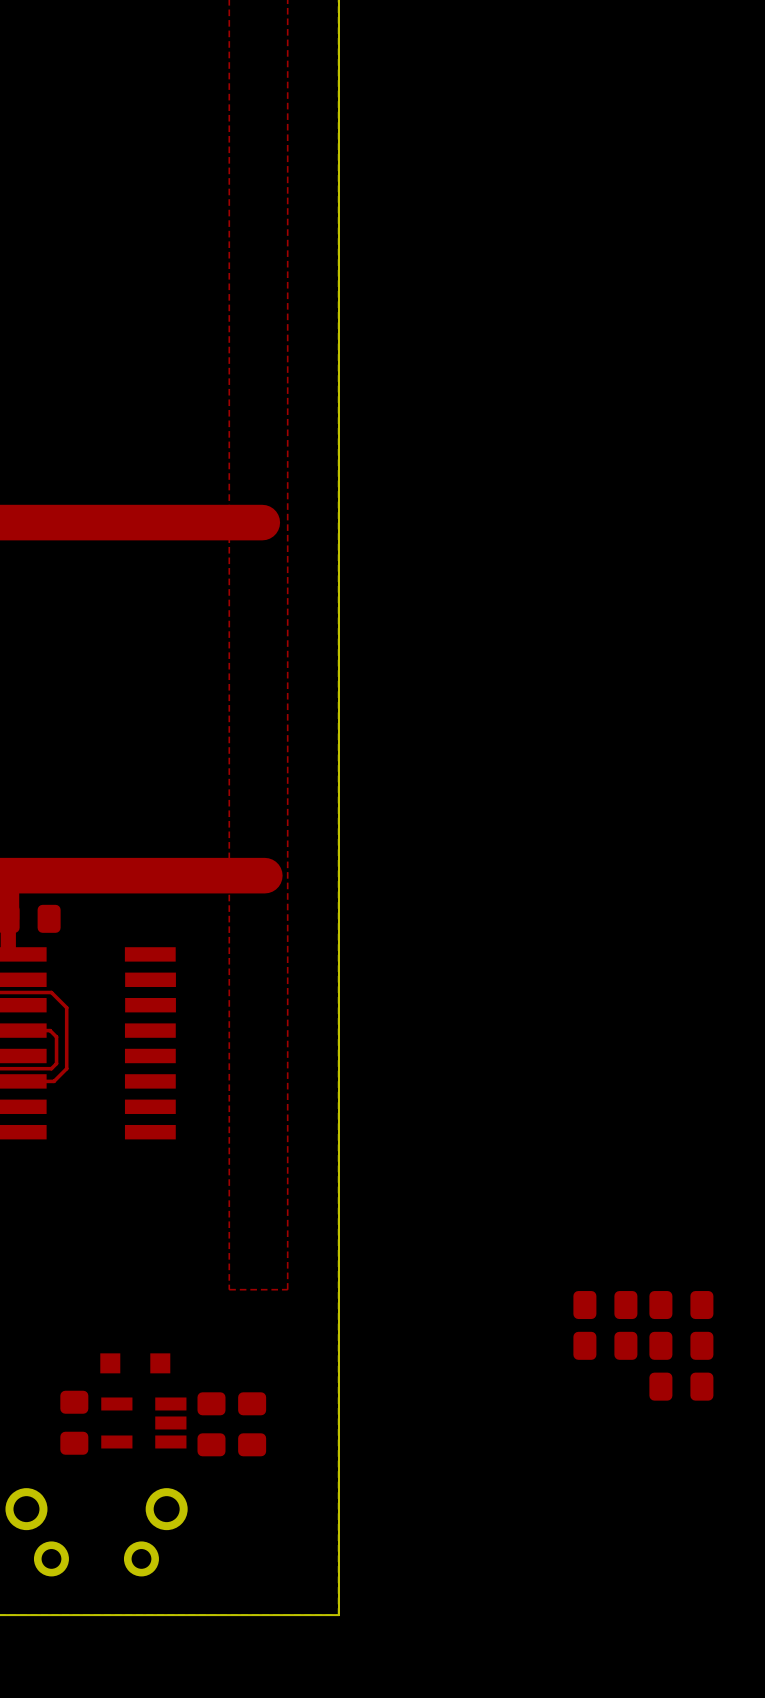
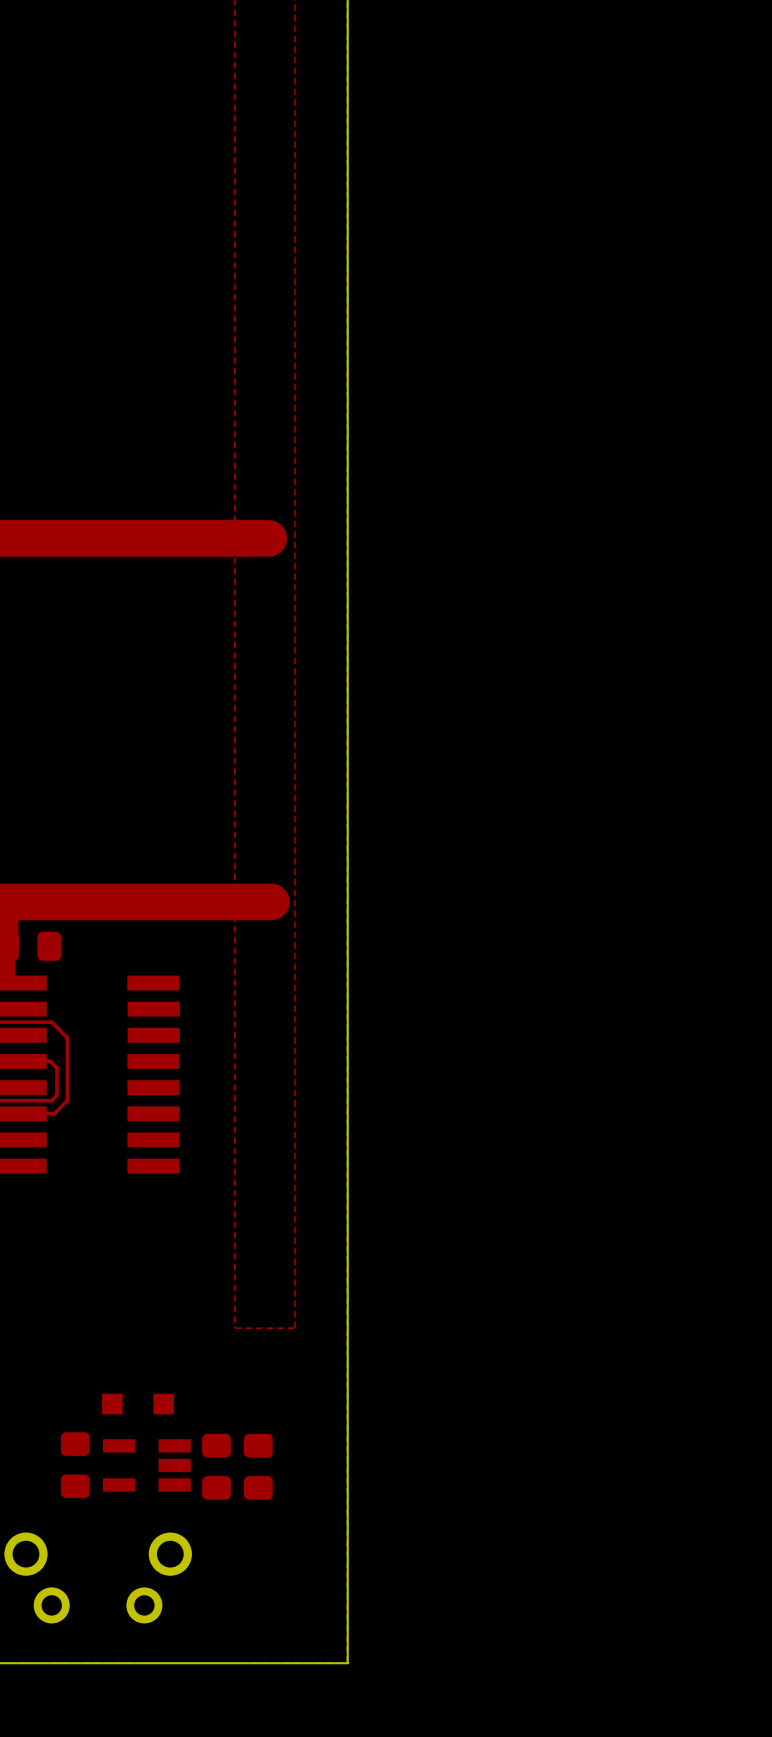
part: (605, 1305) -> none
part: (681, 1305) -> none
part: (605, 1345) -> none
part: (681, 1345) -> none
part: (681, 1386) -> none

